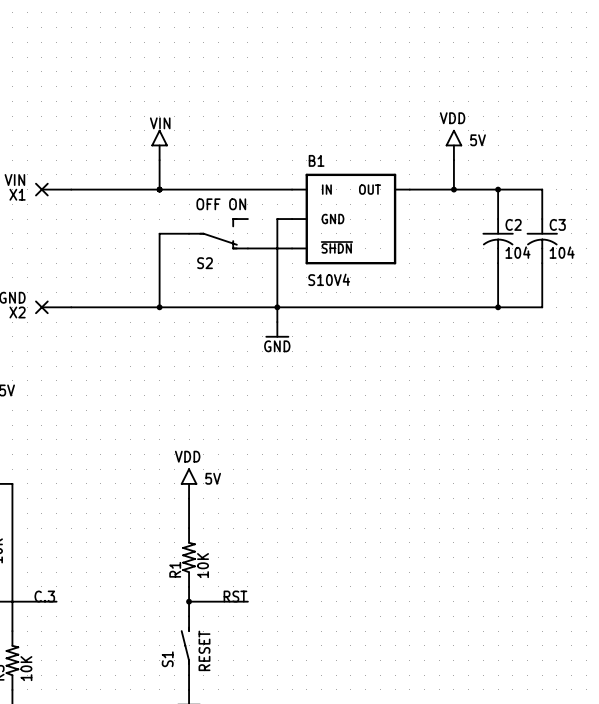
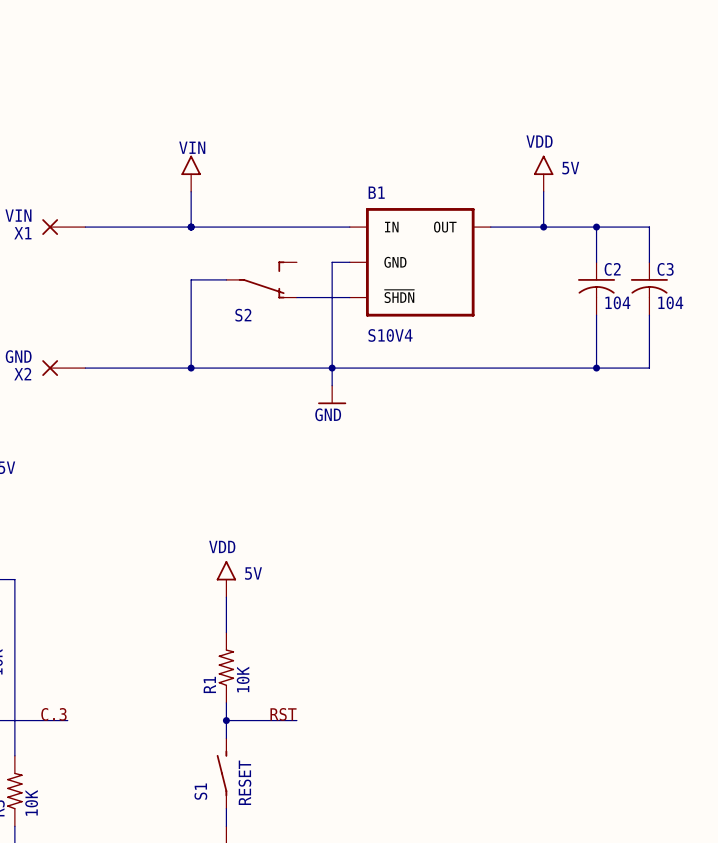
S2 value: OFF ON (221, 204) -> none

